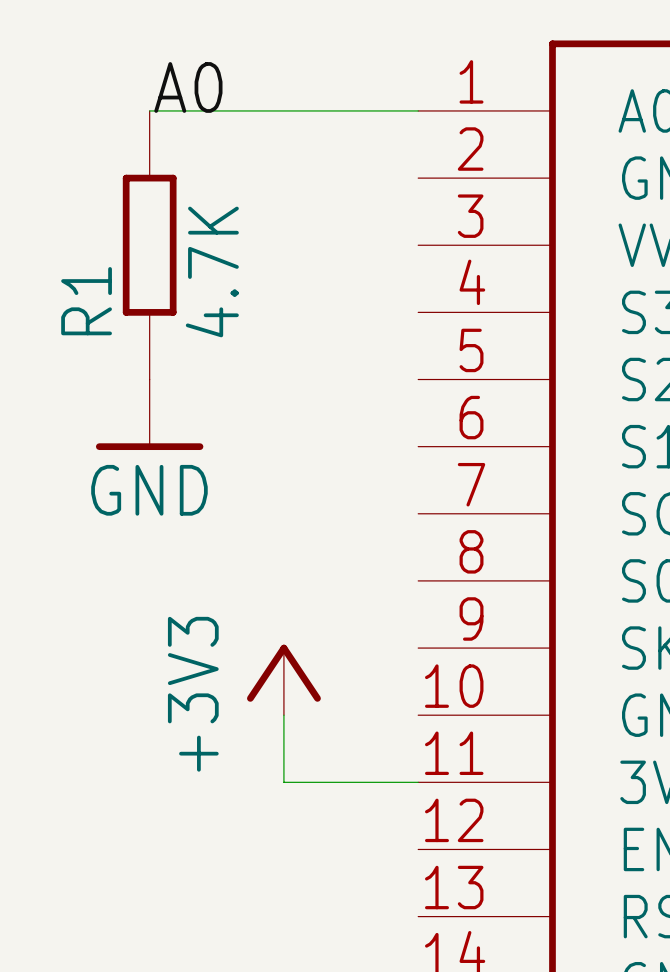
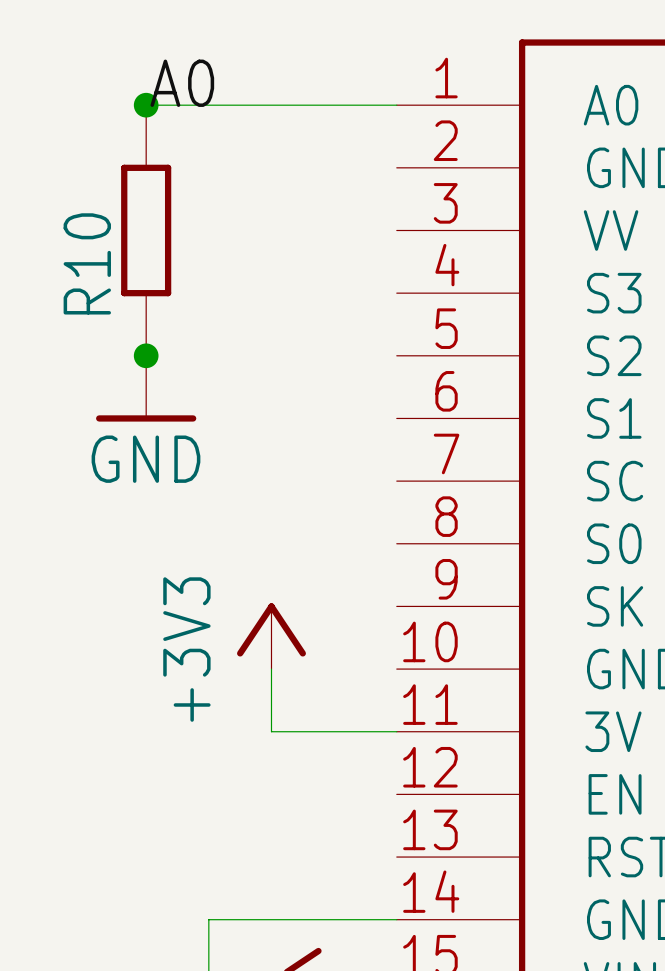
junction: none -> (146, 105)
R1 value: 4.7K (212, 271) -> none
R1 name: R1 (86, 301) -> R10 (87, 263)
junction: none -> (146, 355)

